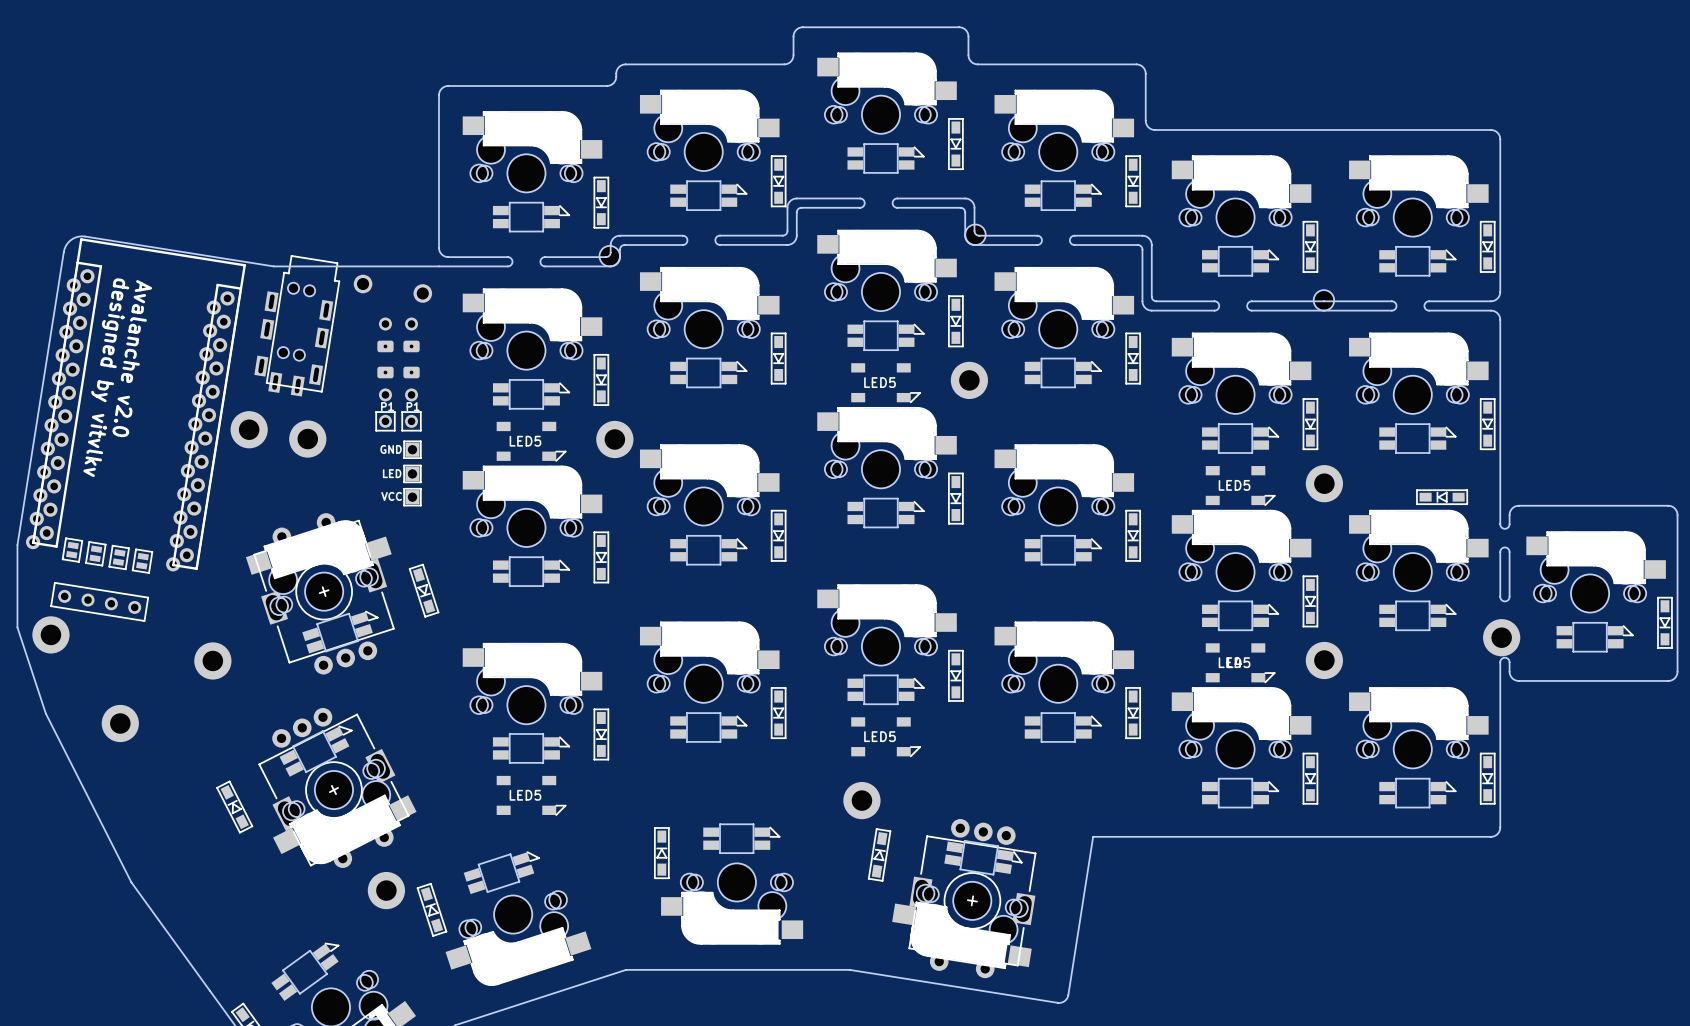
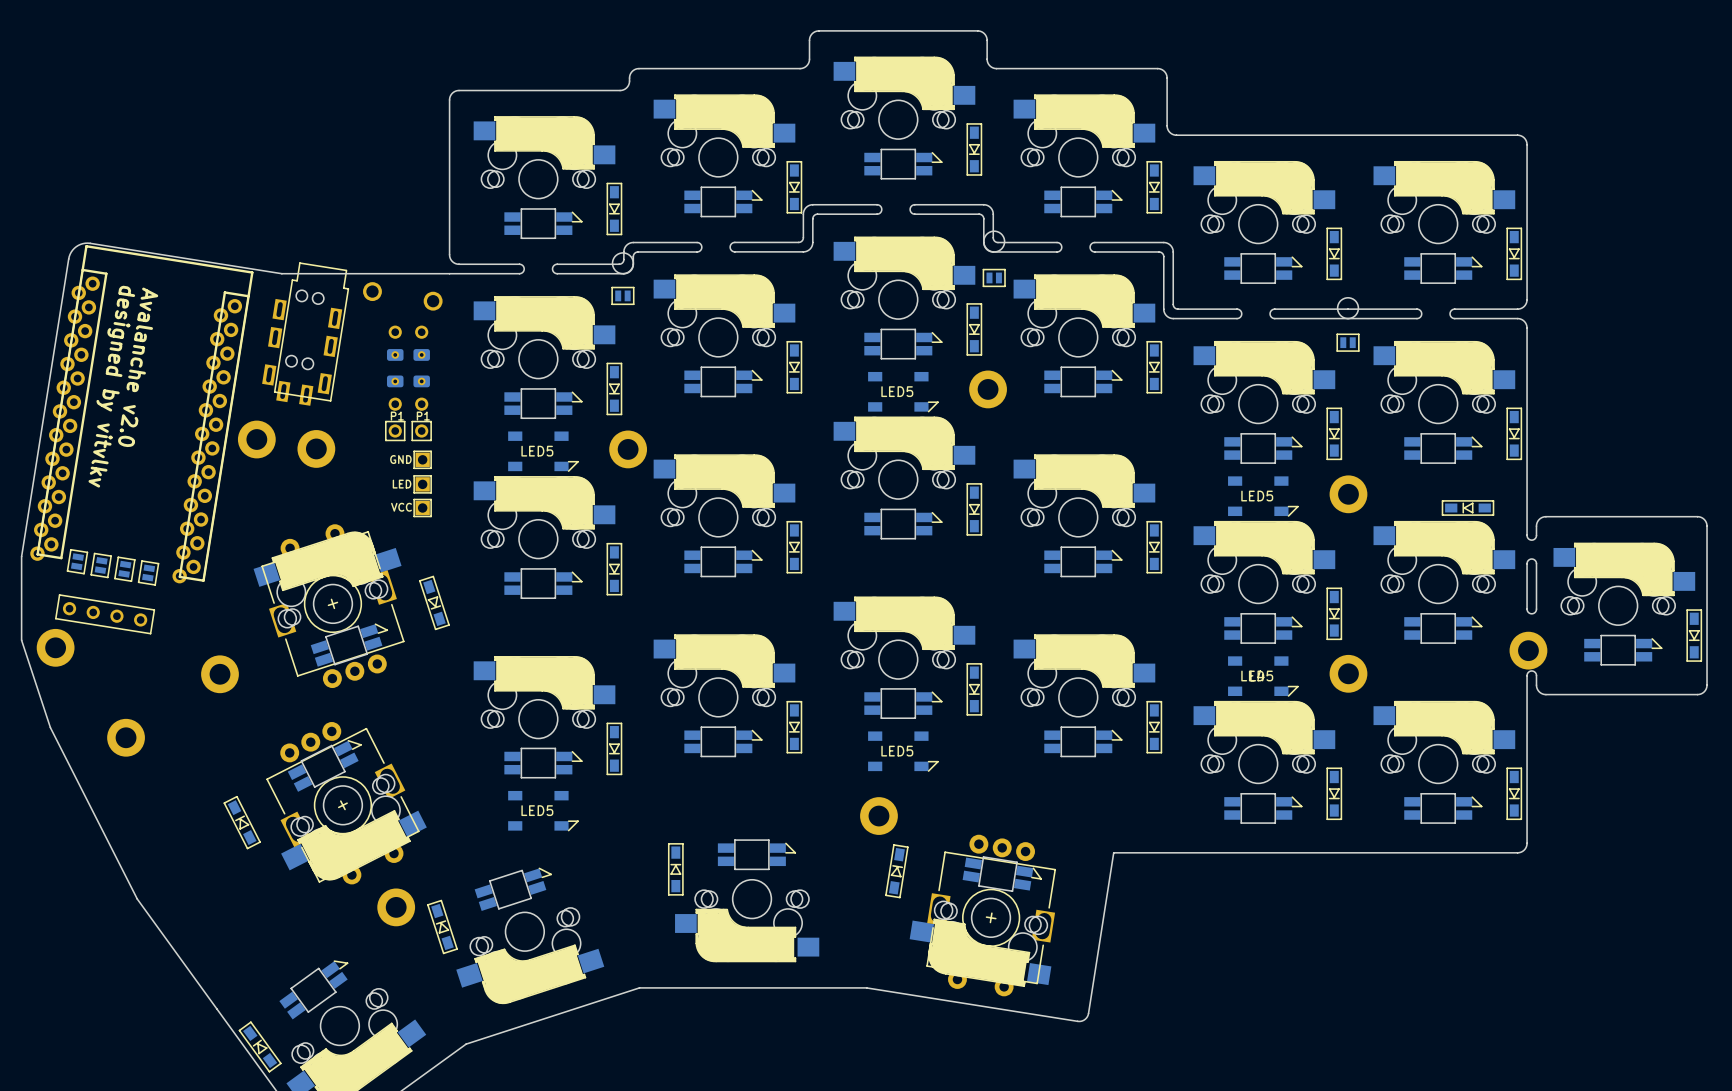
part: none -> (994, 277)
part: none -> (622, 295)
part: none -> (1348, 342)

